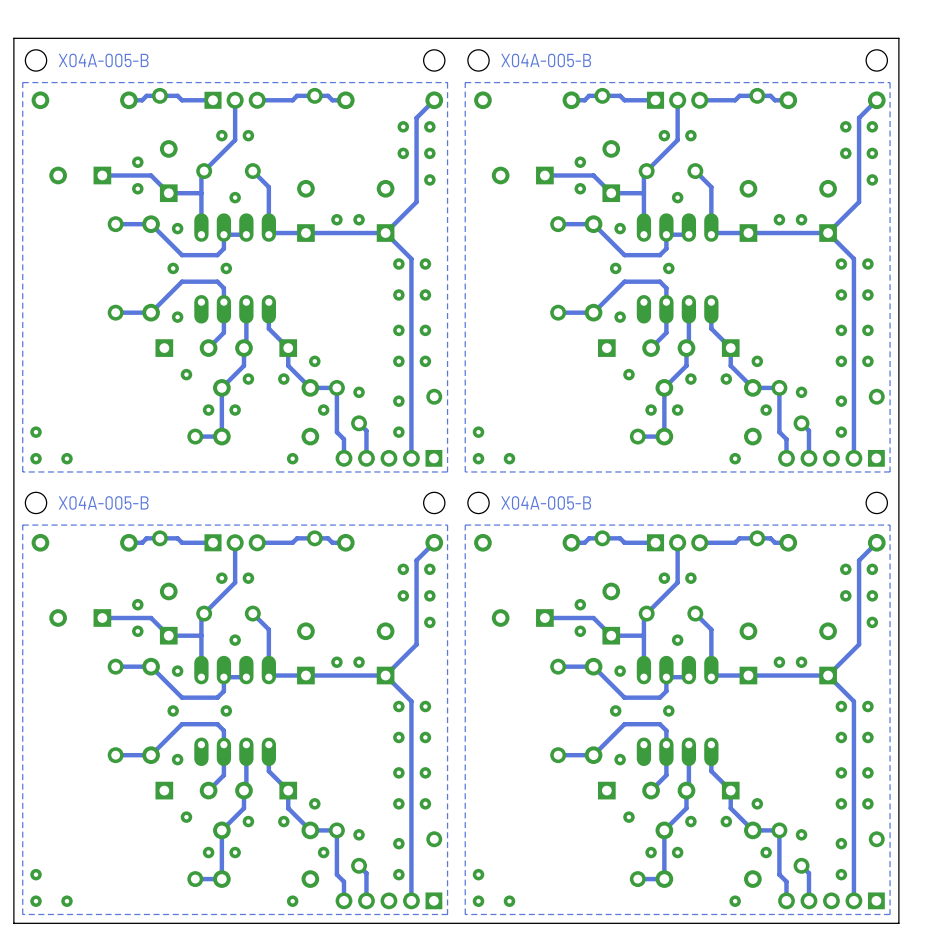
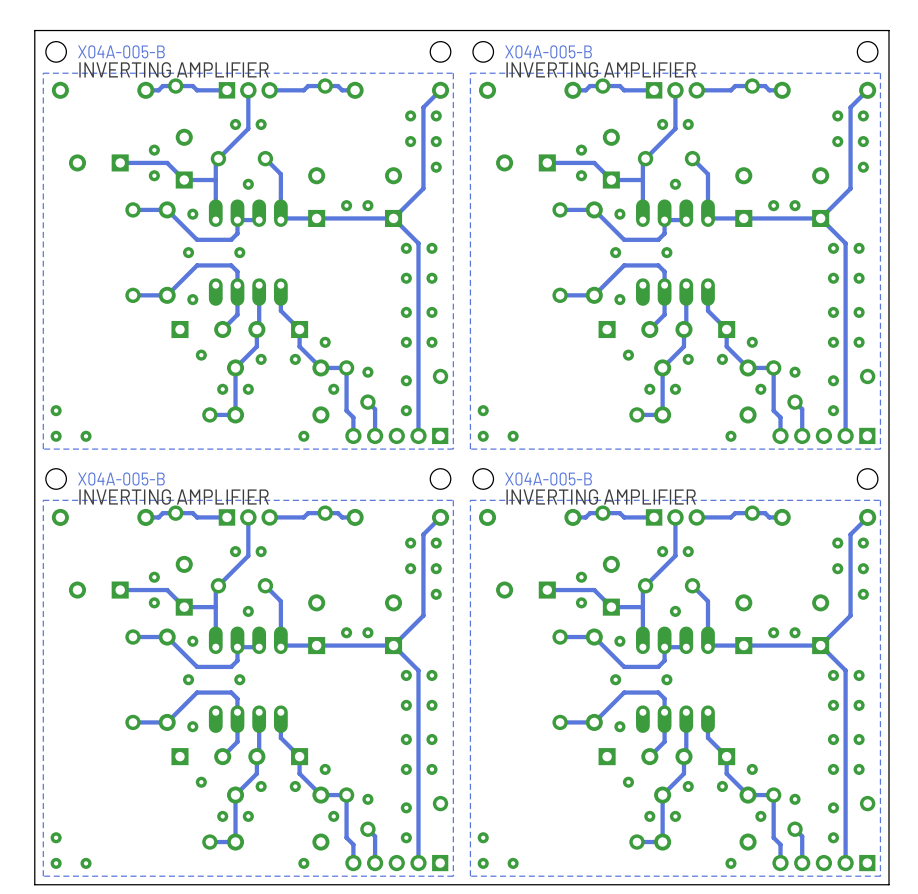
text: none -> INVERTING AMPLIFIER (174, 69)
text: none -> INVERTING AMPLIFIER (601, 69)
text: none -> INVERTING AMPLIFIER (174, 497)
text: none -> INVERTING AMPLIFIER (601, 497)

